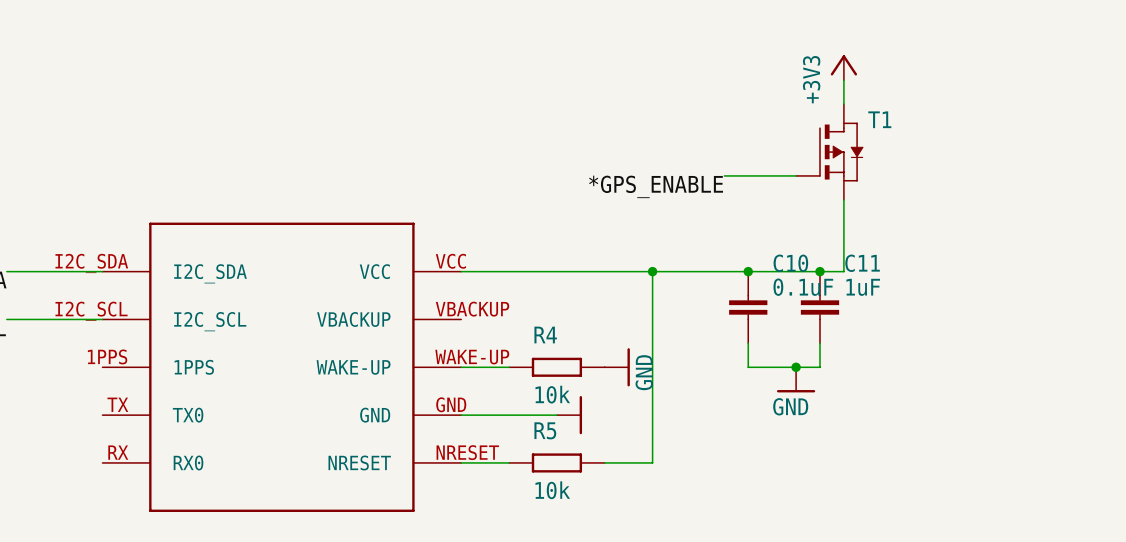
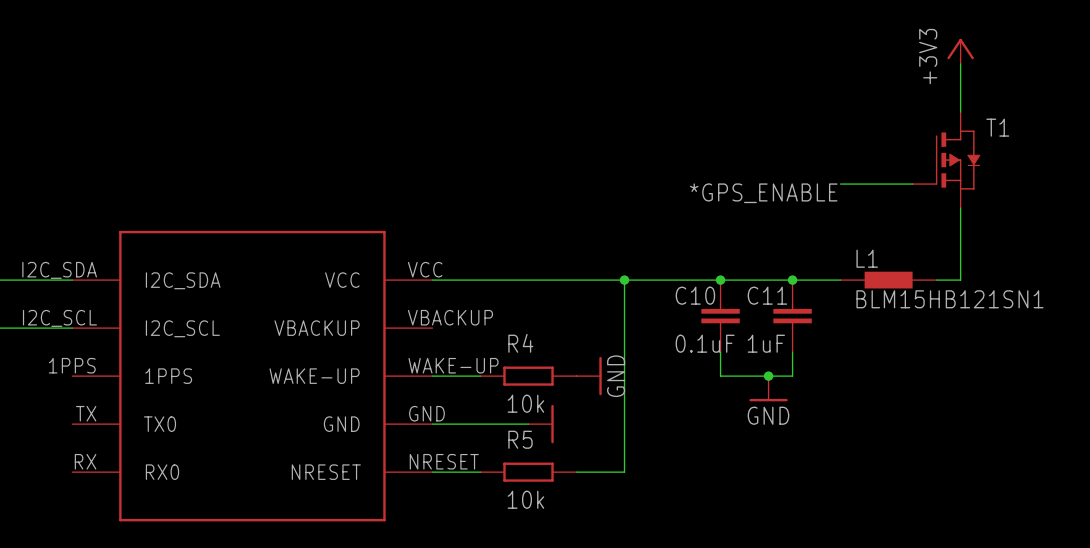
wire: none -> (960, 64) (960, 112)
power symbol position: +3V3 (843, 67) -> +3V3 (960, 51)
wire: (843, 80) (843, 104) -> none
T1 position: (829, 152) -> (946, 160)
wire: (724, 175) (796, 175) -> (840, 184) (912, 184)
label position: *GPS_ENABLE (656, 186) -> *GPS_ENABLE (763, 193)
wire: (843, 199) (843, 271) -> (840, 280) (816, 280)
wire: none -> (960, 208) (960, 280) (936, 280)
C10 name position: C10 (790, 263) -> C10 (695, 295)
C11 name position: C11 (862, 263) -> C11 (767, 295)
L1: none -> BLM15HB121SN1 (888, 280)
C10 value position: 0.1uF (803, 287) -> 0.1uF (705, 343)
C11 value position: 1uF (863, 287) -> 1uF (766, 343)

